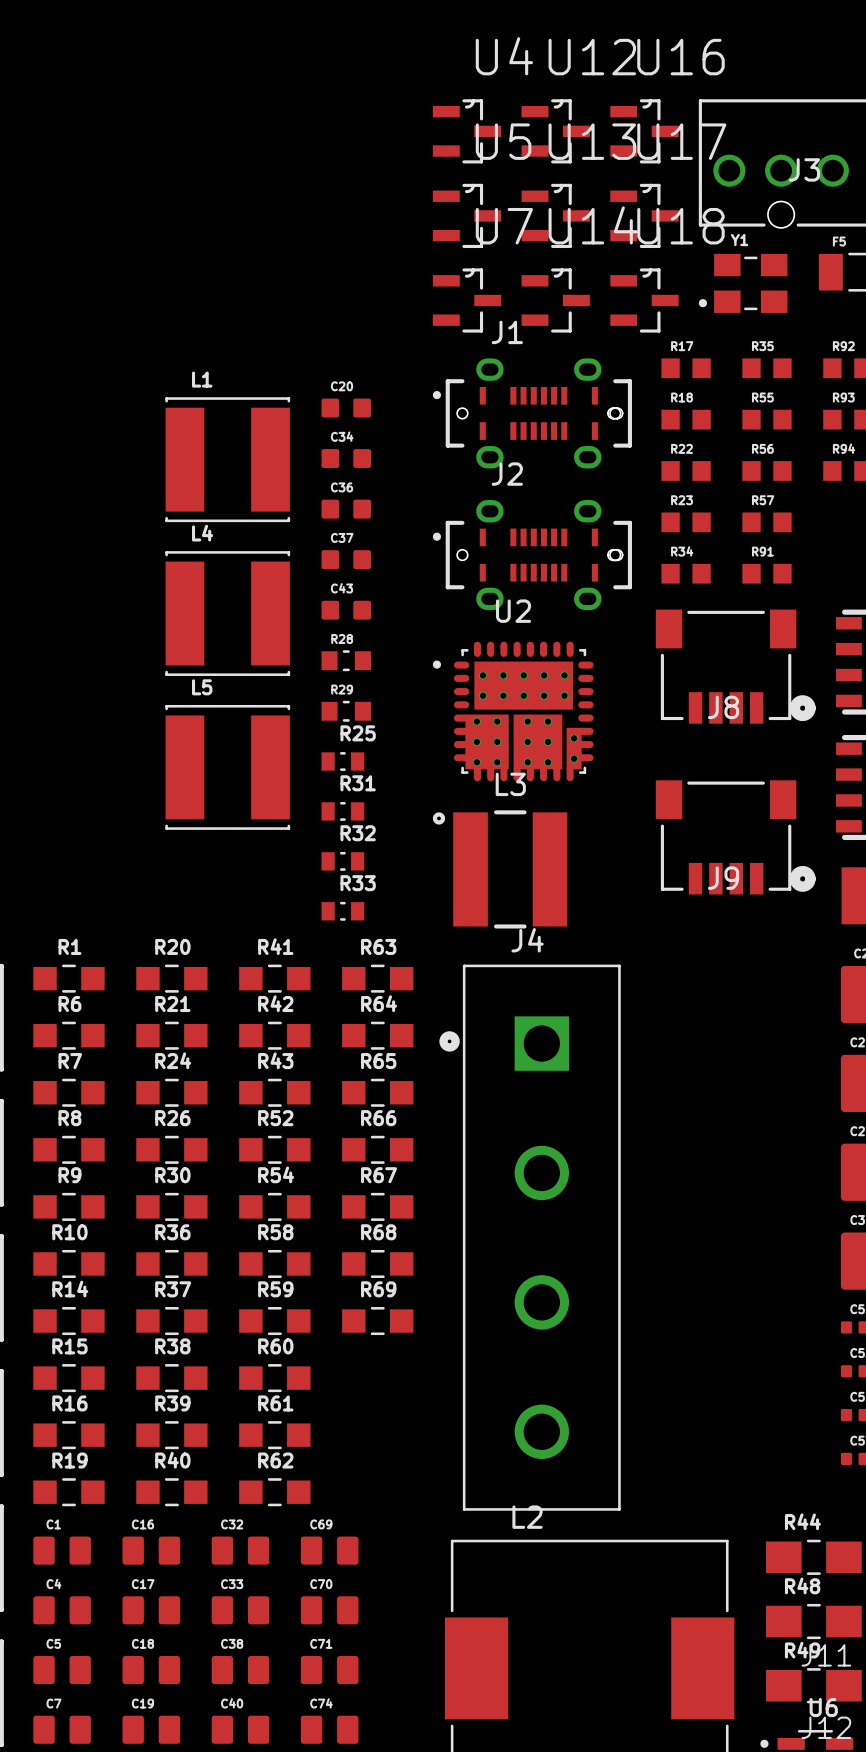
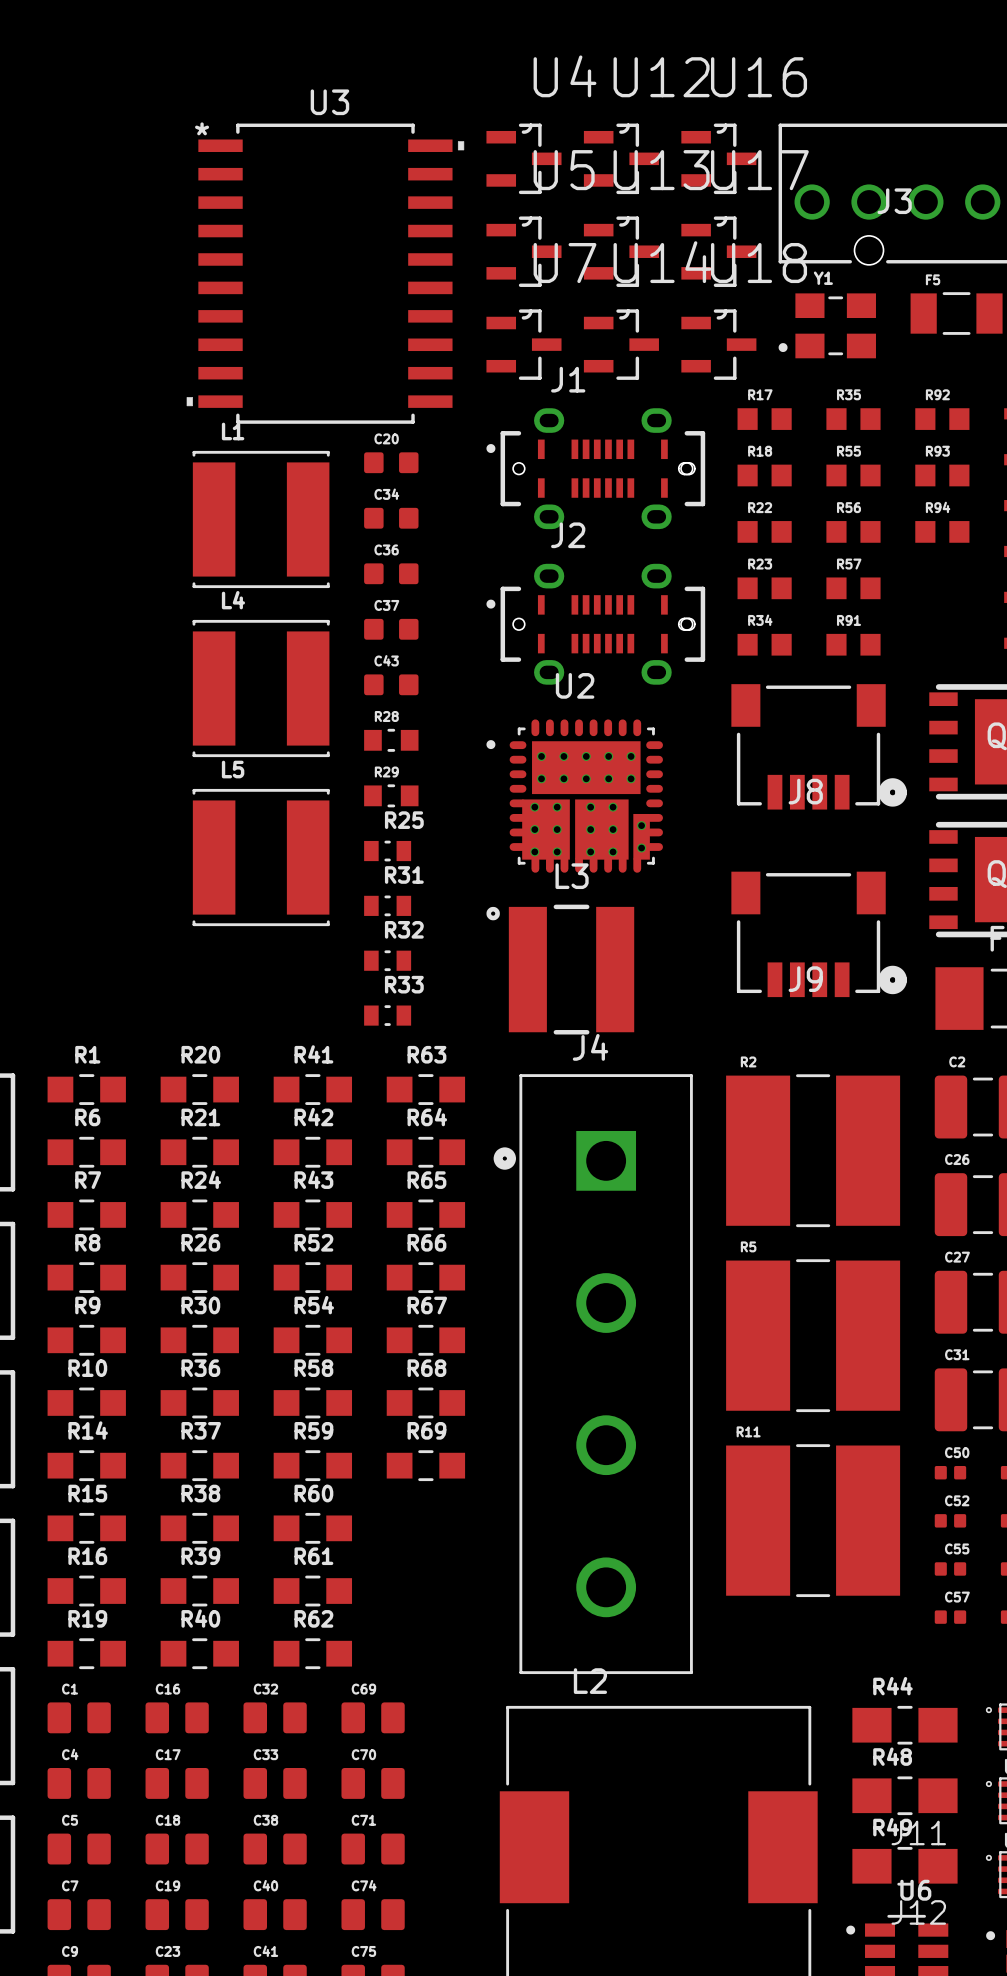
U3: none -> (325, 273)
R2: none -> (813, 1150)
R5: none -> (813, 1335)
R11: none -> (813, 1520)

